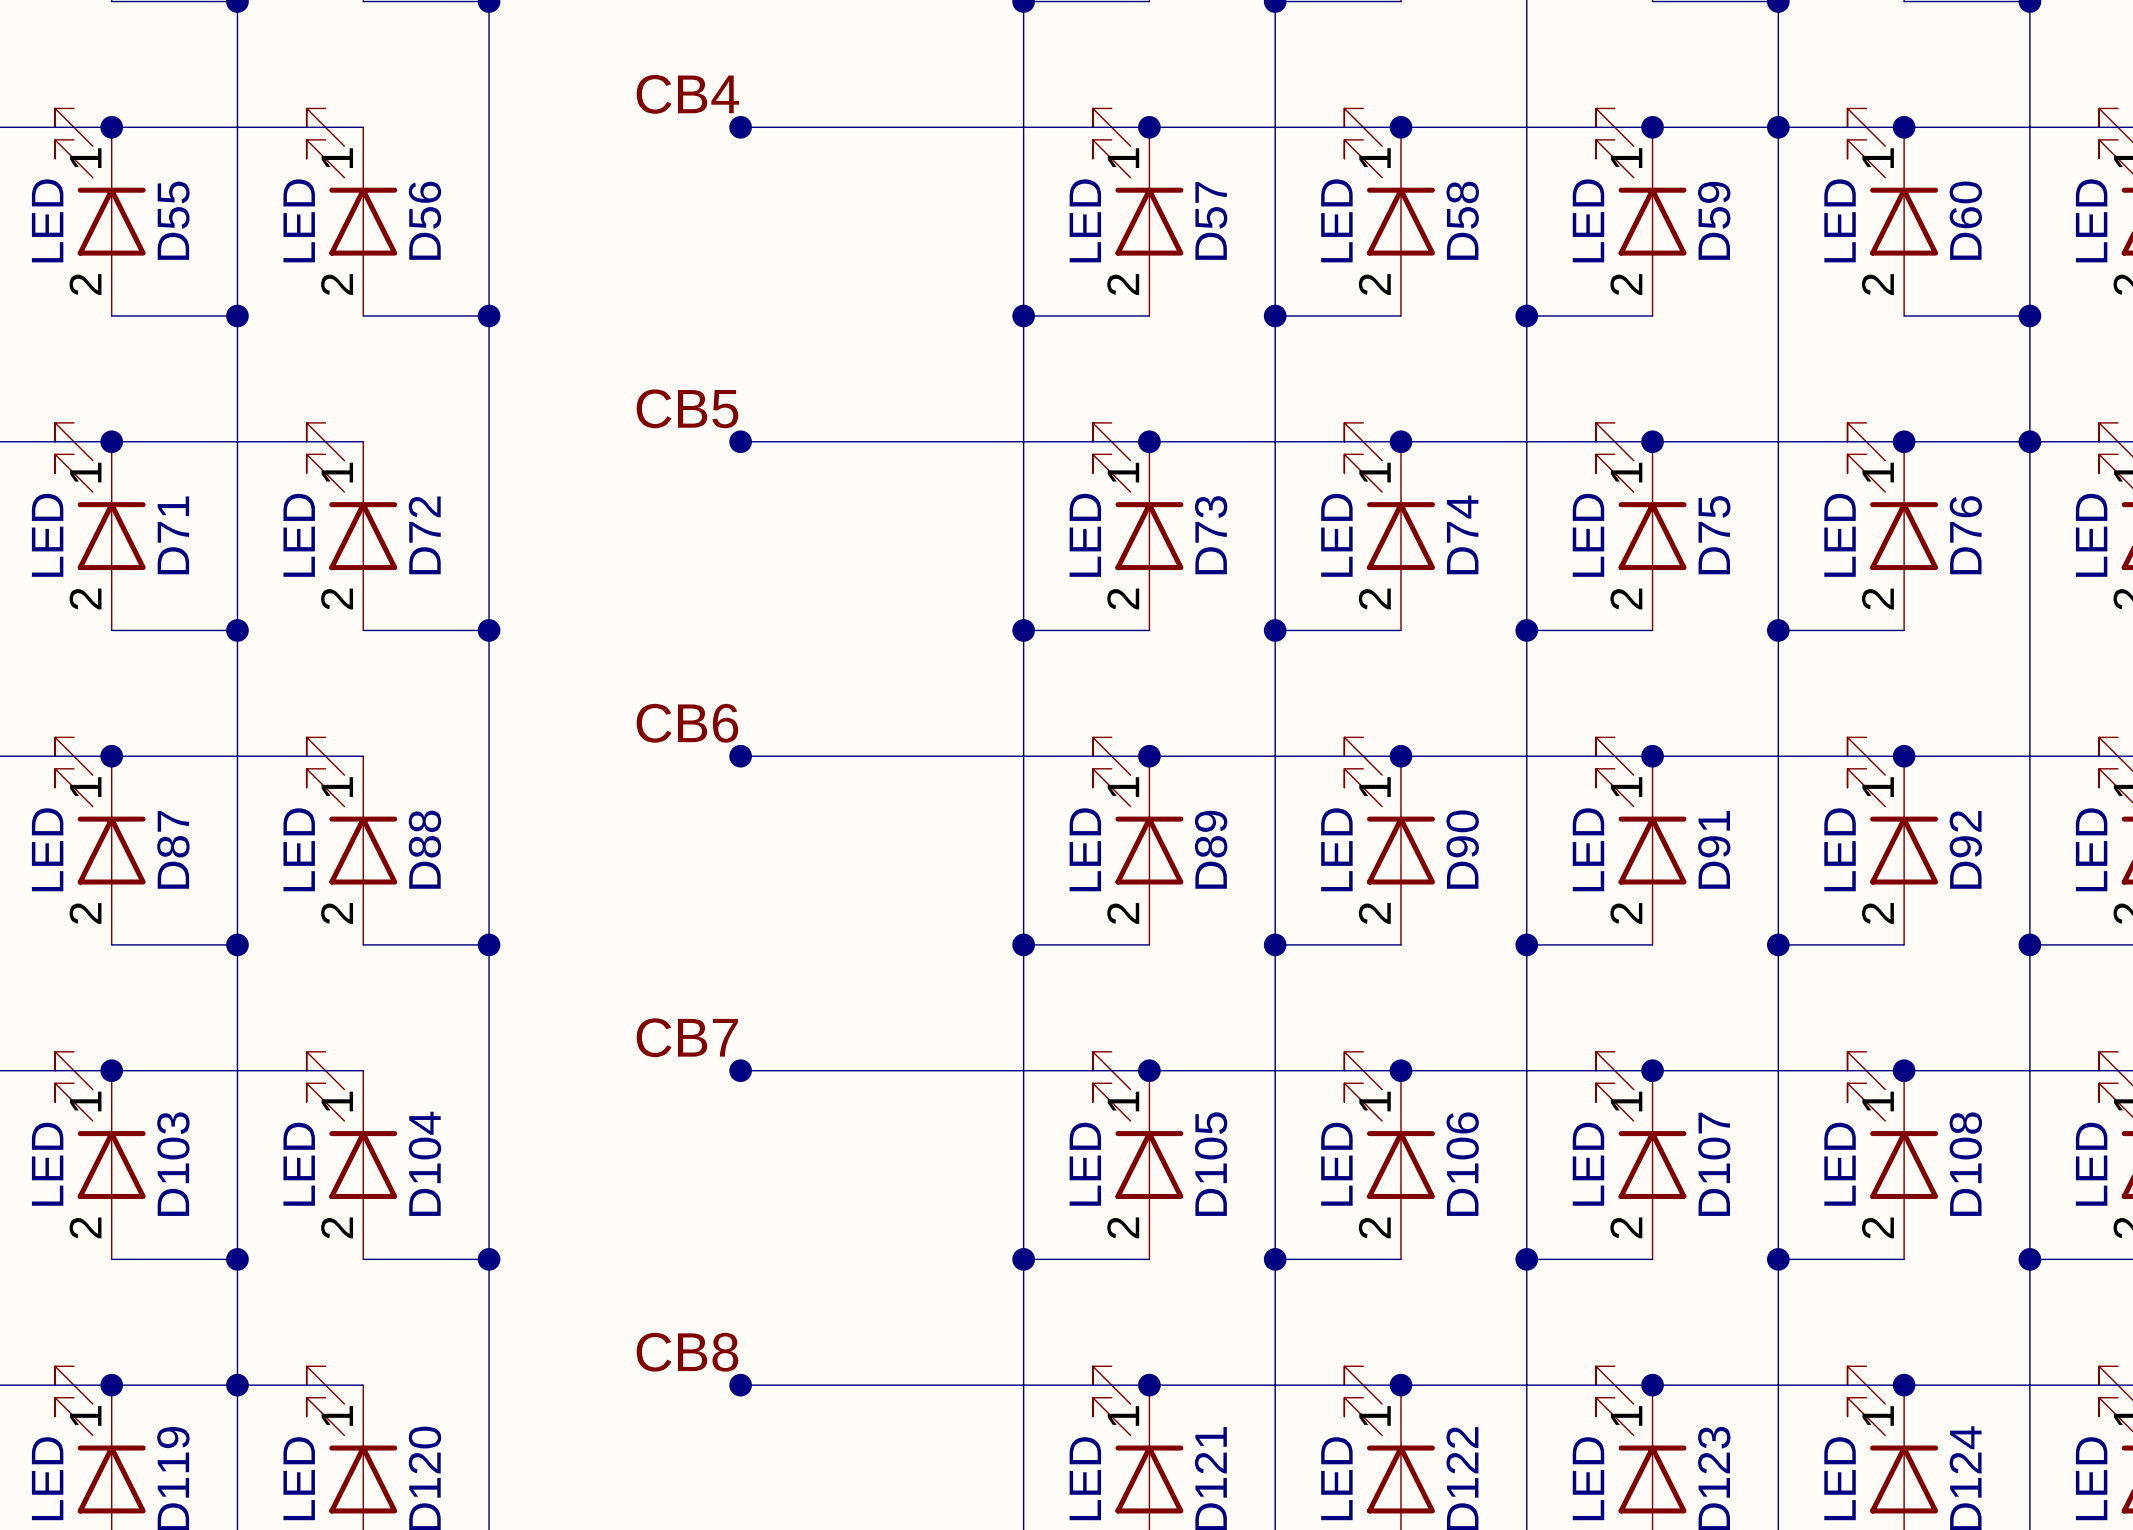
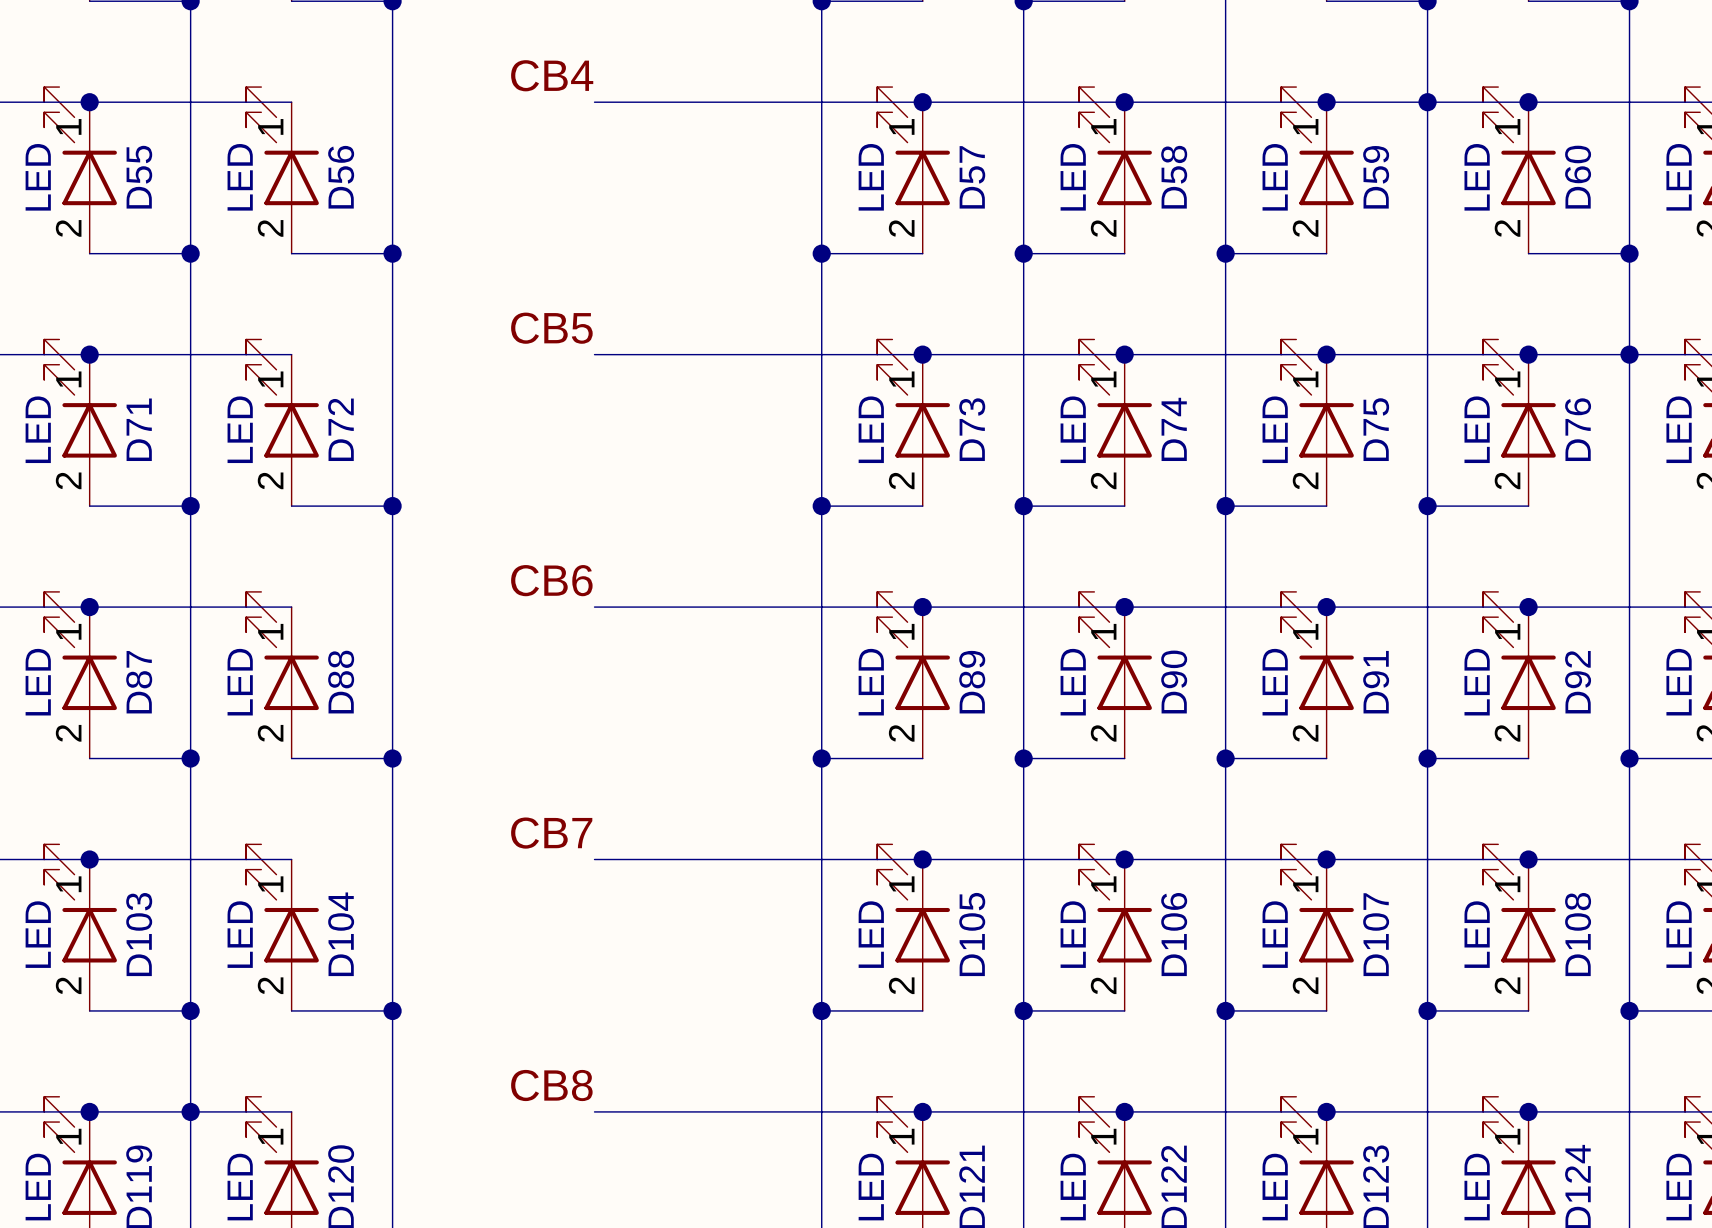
junction: (740, 127) -> none
junction: (740, 441) -> none
junction: (740, 756) -> none
junction: (740, 1070) -> none
junction: (740, 1385) -> none

